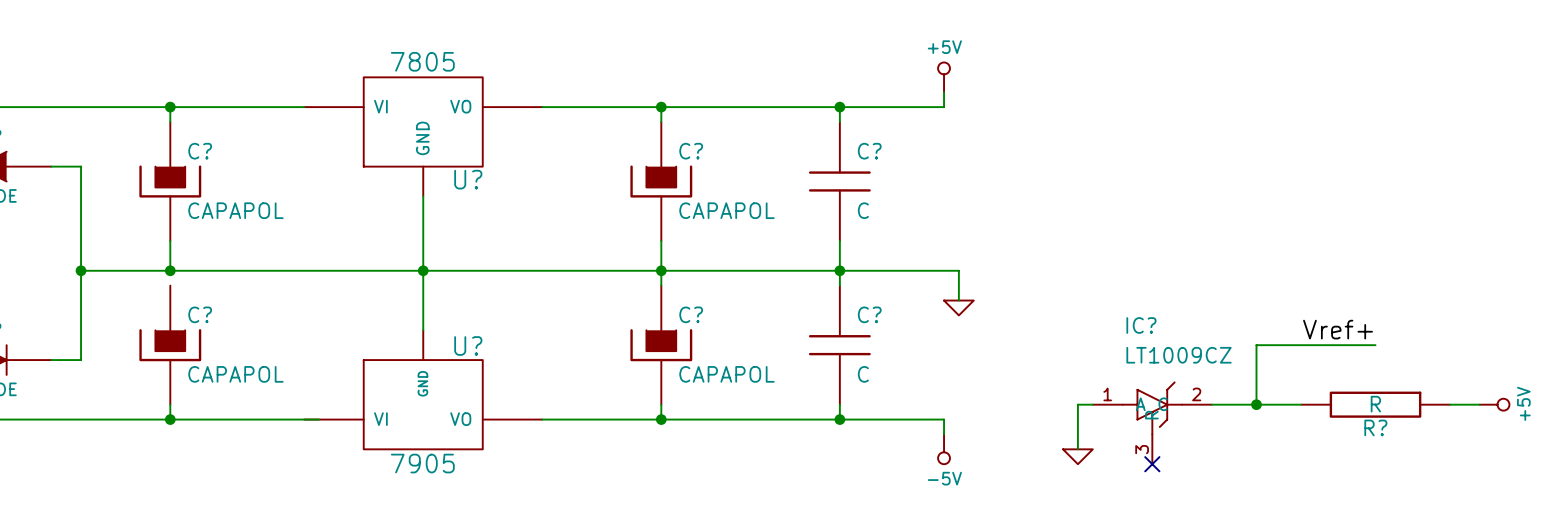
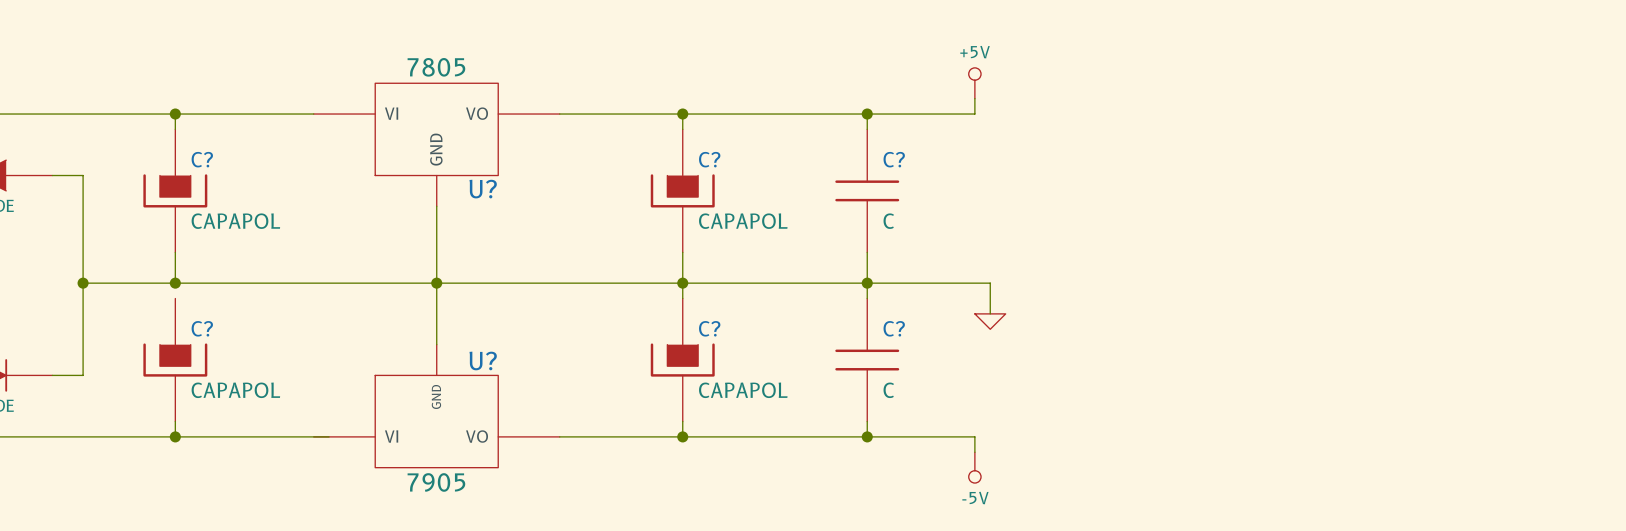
label: Vref+ (1338, 329) -> none
wire: (1375, 345) (1256, 345) (1256, 404) -> none
wire: (1092, 404) (1077, 404) (1077, 449) -> none
wire: (1211, 404) (1301, 404) -> none
junction: (1256, 404) -> none
R?: R (1375, 404) -> none
wire: (1449, 404) (1479, 404) -> none
power symbol: +5V (1494, 404) -> none
IC?: LT1009CZ (1152, 423) -> none
power symbol: (1077, 456) -> none
no-connect mark: (1152, 464) -> none

